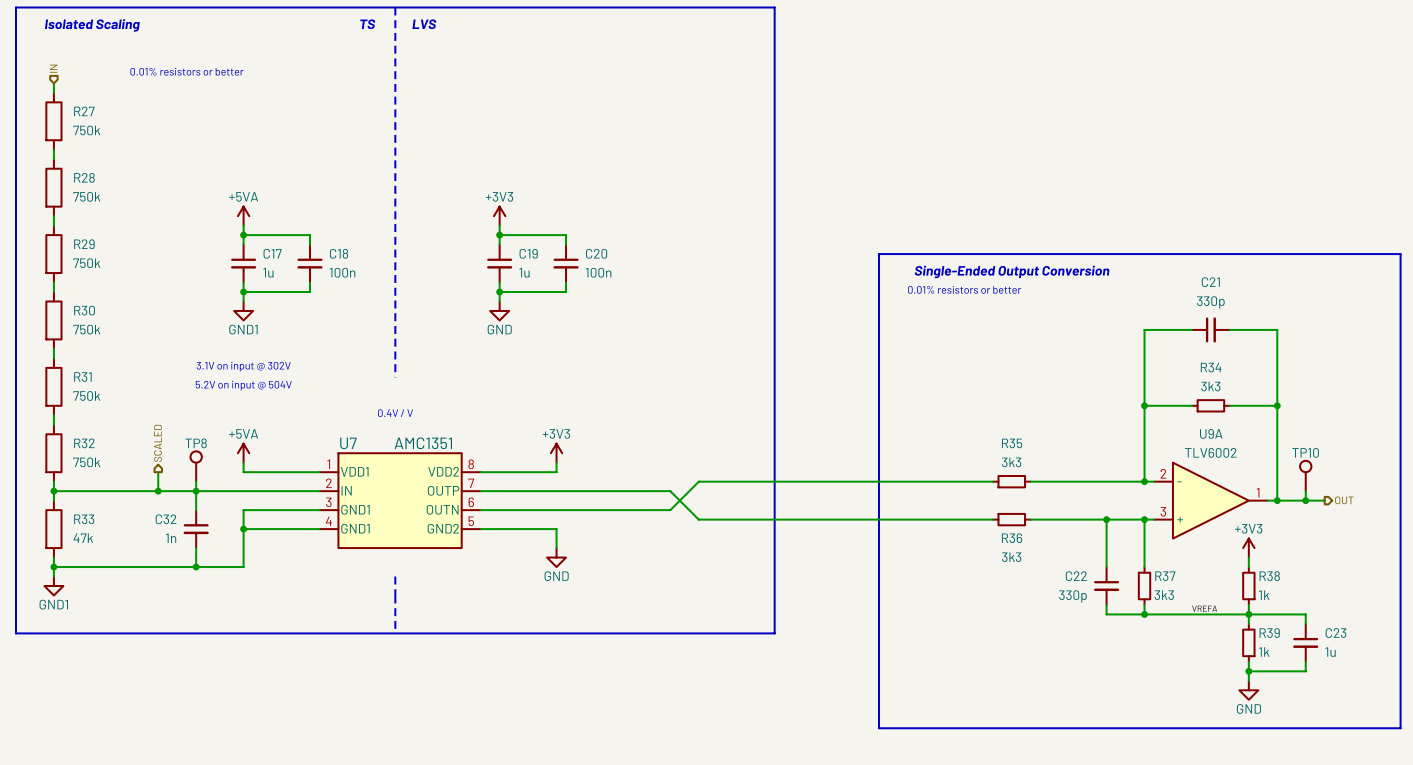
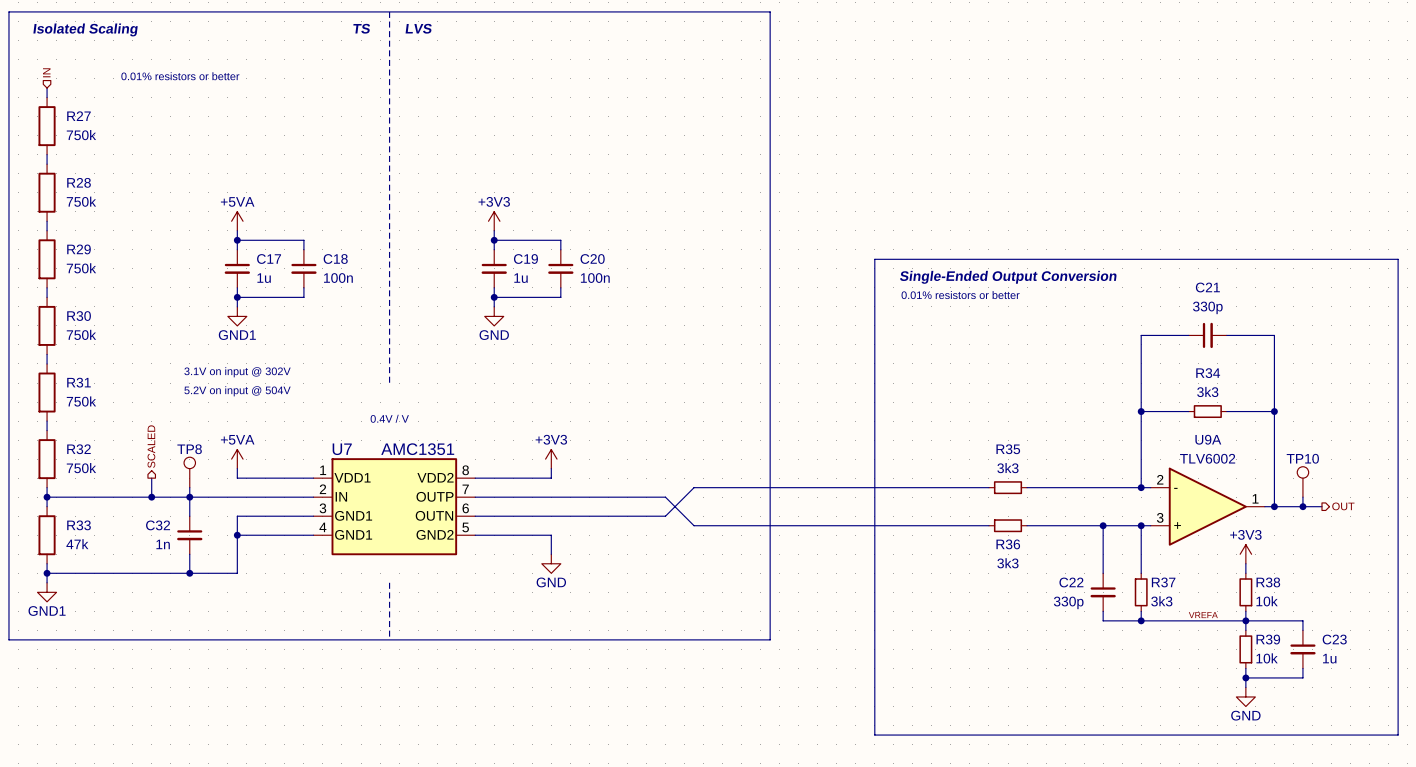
R38 value: 1k (1264, 595) -> 10k (1267, 601)
R39 value: 1k (1264, 652) -> 10k (1267, 658)

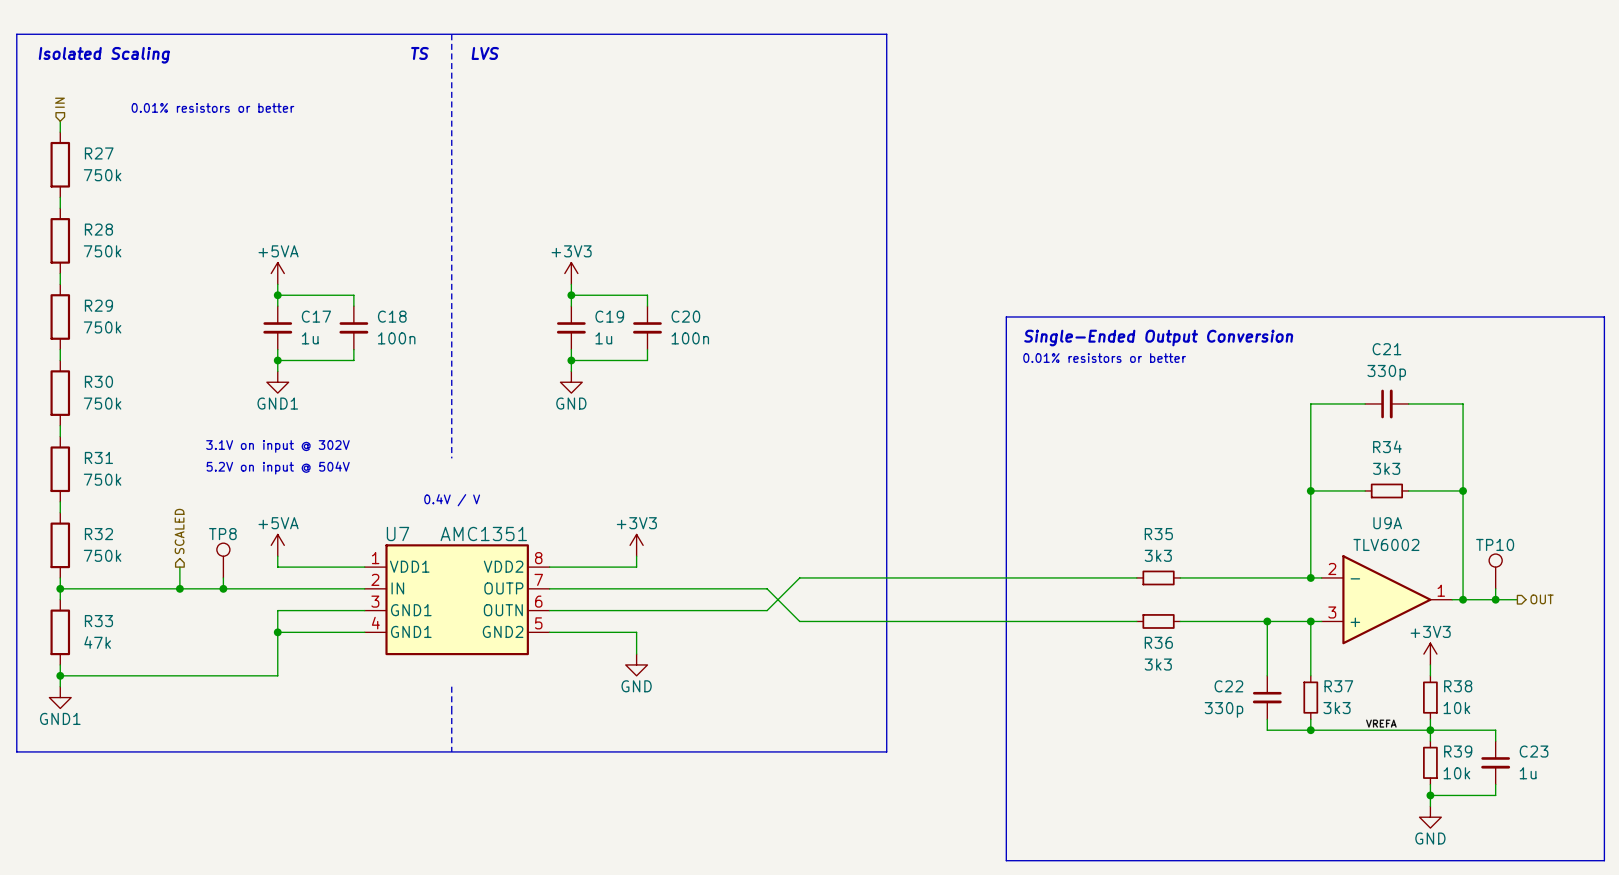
wire: (189, 497) (189, 516) -> none
C32: 1n (189, 535) -> none
wire: (189, 554) (189, 573) -> none
junction: (189, 573) -> none

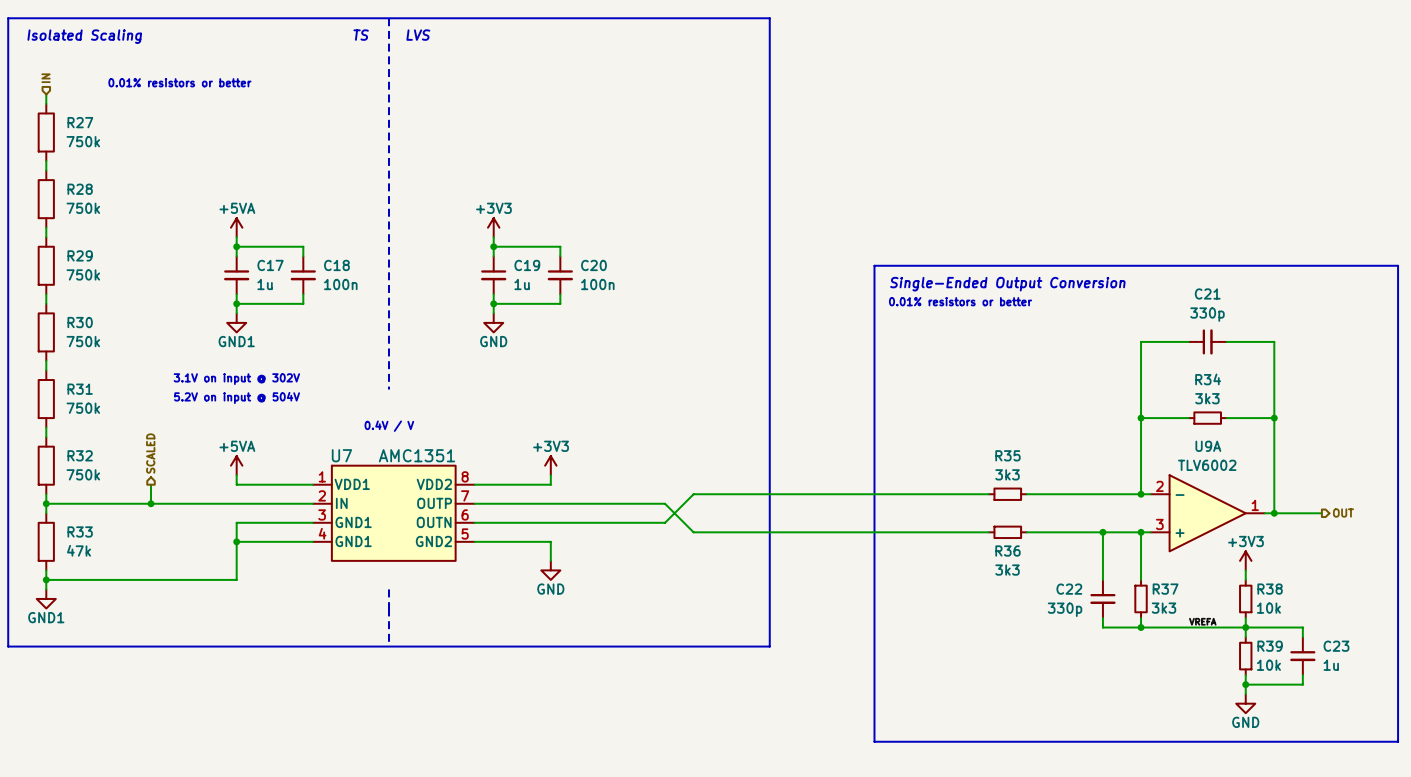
TP8: (223, 560) -> none
TP10: (1495, 571) -> none
wire: (223, 577) (223, 588) -> none
junction: (223, 588) -> none
wire: (1495, 588) (1495, 599) -> none
junction: (1495, 599) -> none

